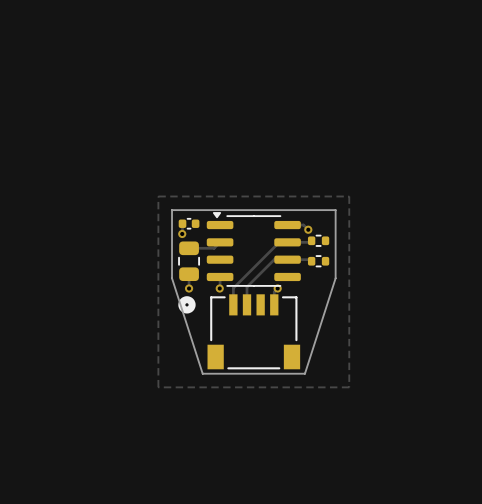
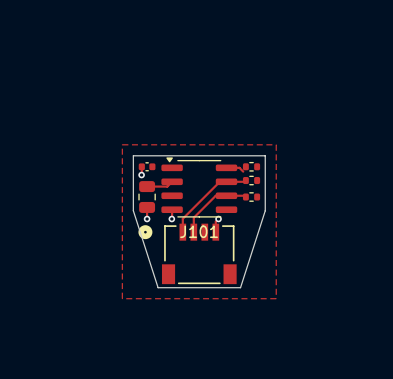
part: none -> (251, 166)
via: (308, 229) -> none
J101 name: none -> J101 (199, 231)

